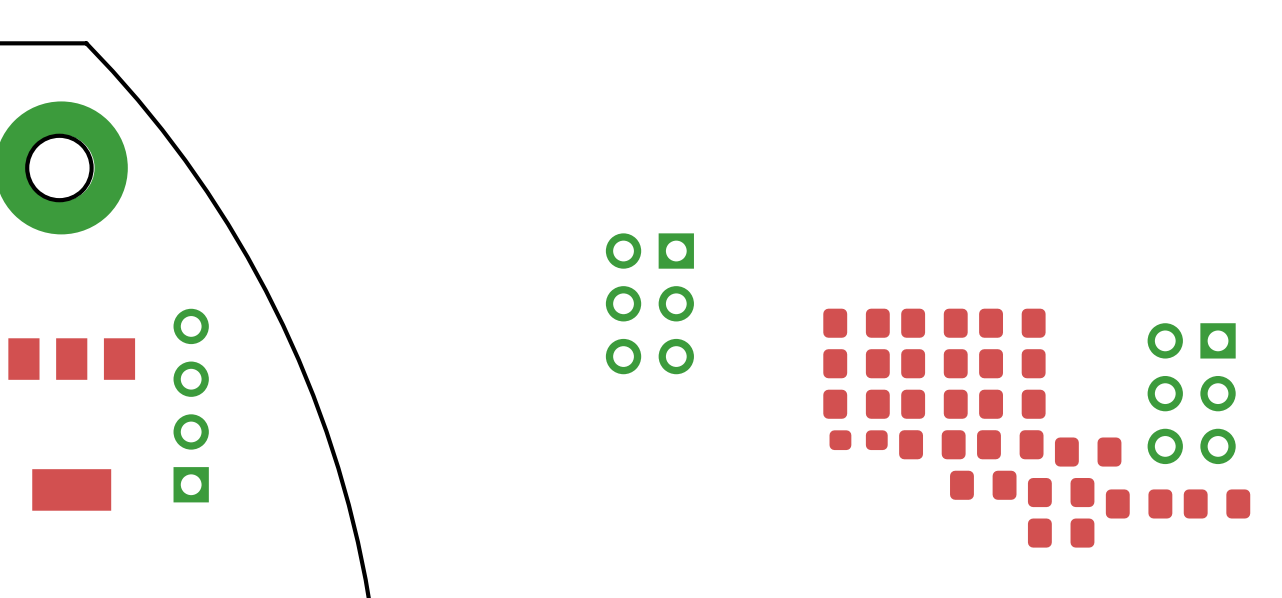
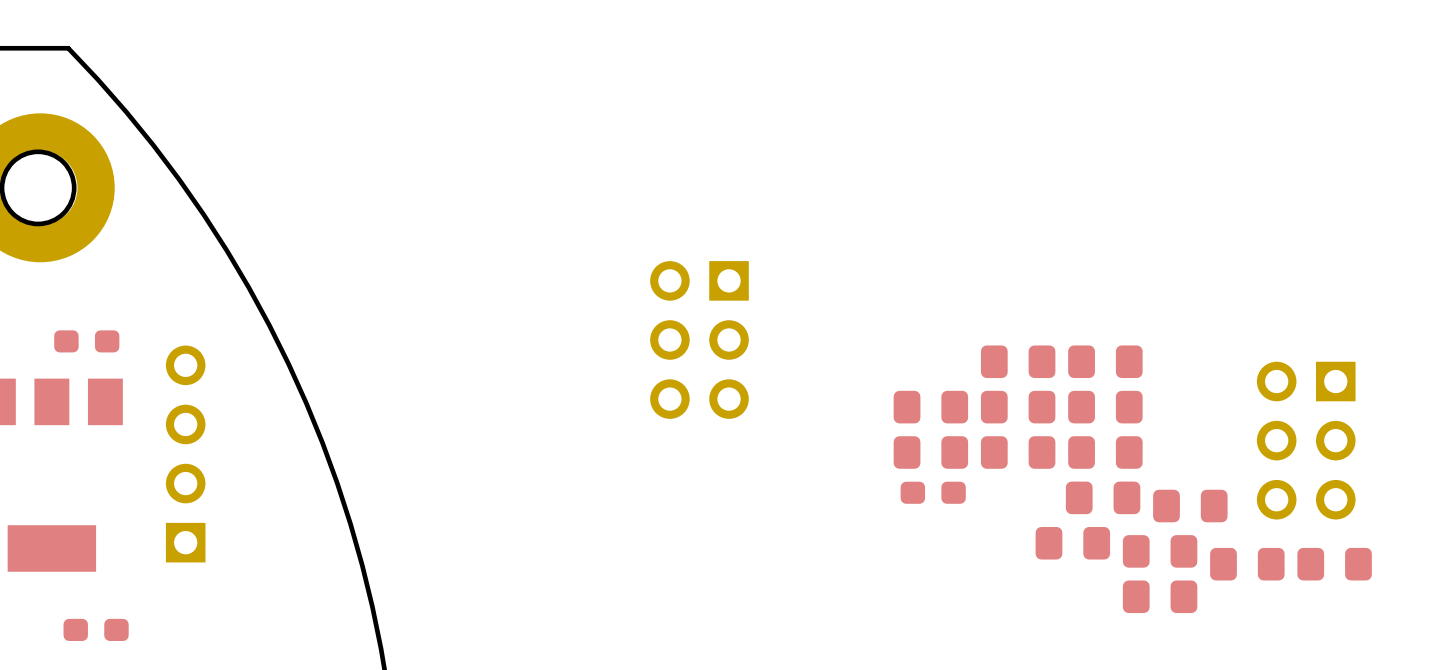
part: none -> (86, 341)
part: (856, 323) -> none
part: (932, 444) -> none
part: none -> (96, 629)

